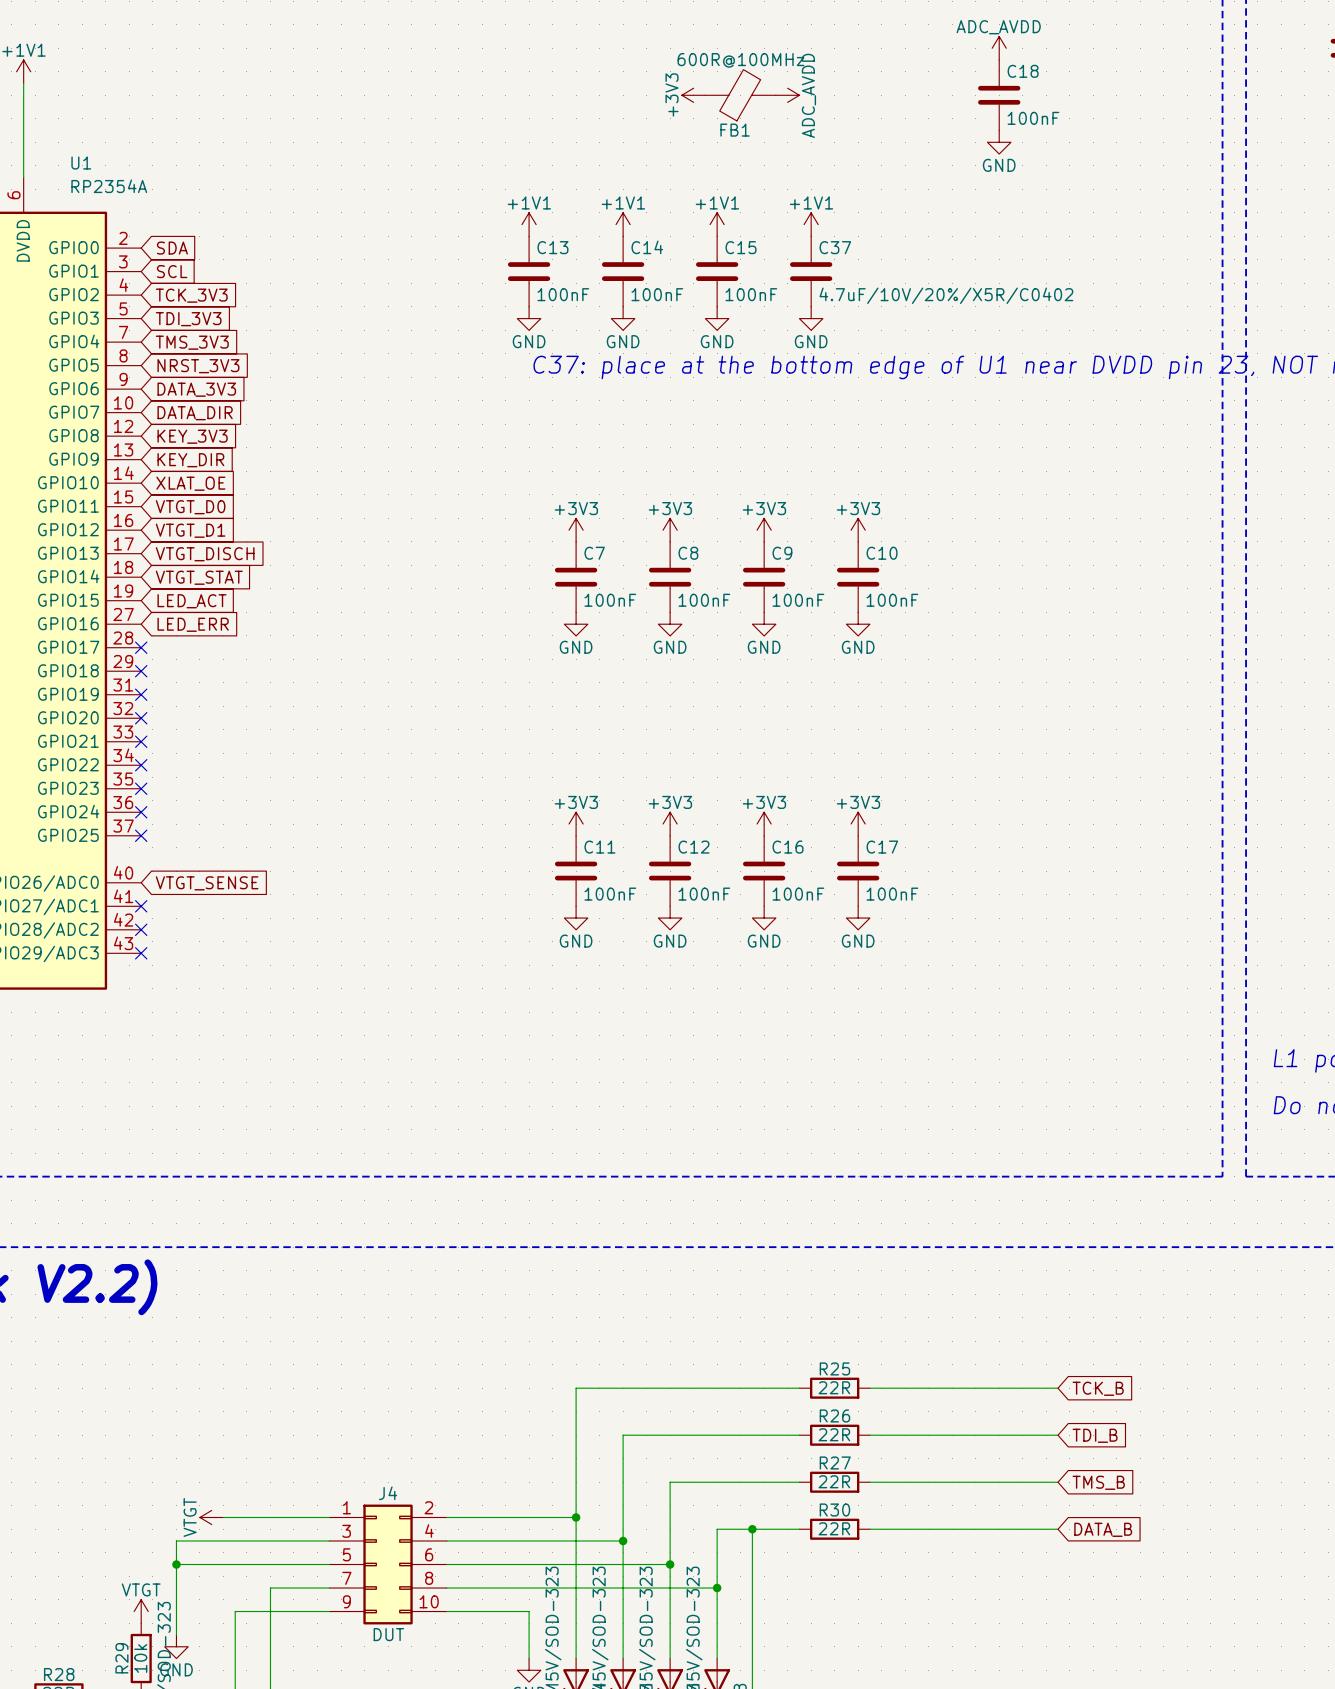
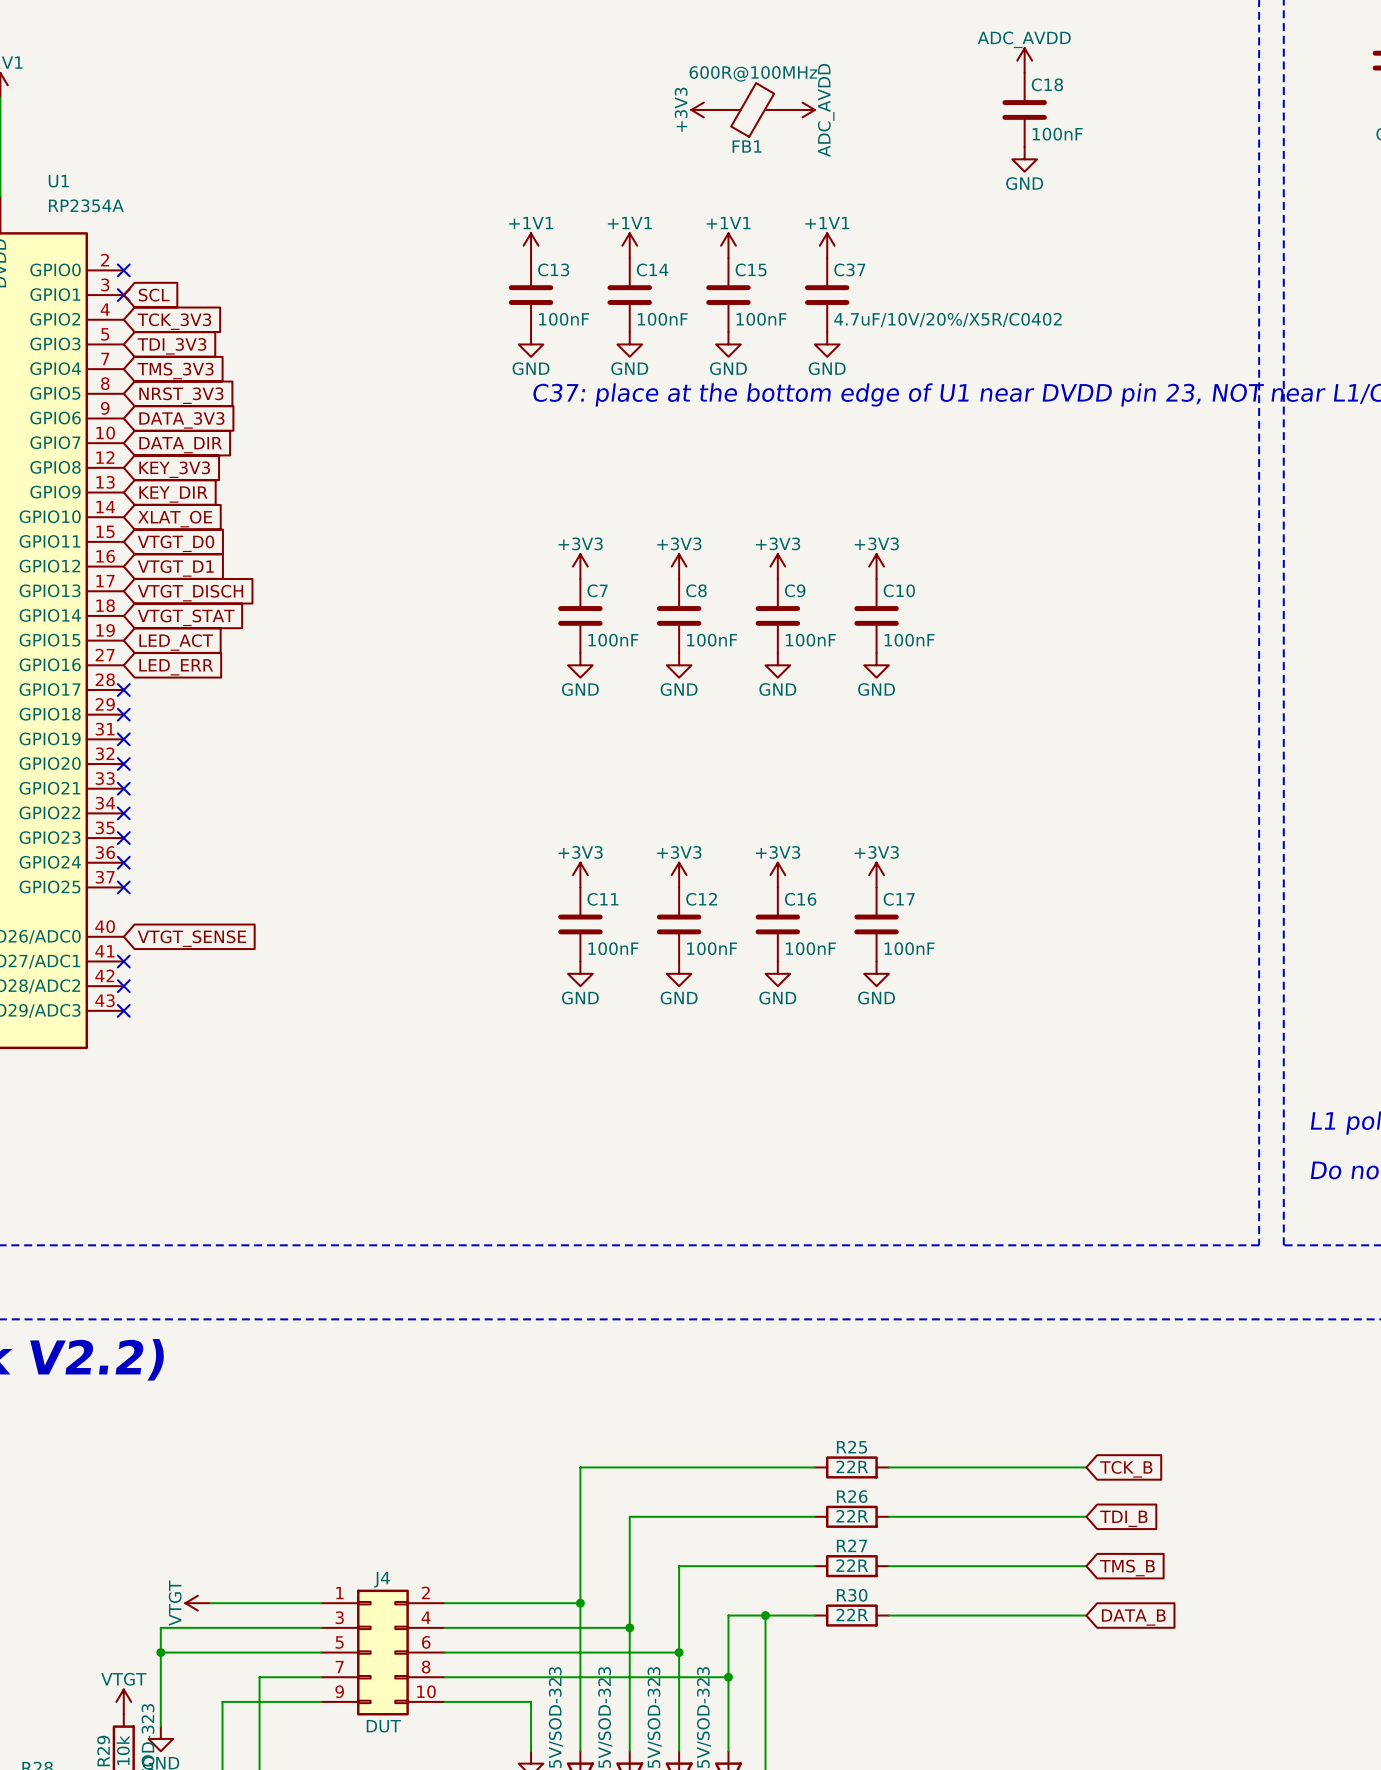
no-connect mark: none -> (123, 270)
global label: SDA (172, 248) -> none
no-connect mark: none -> (123, 295)

